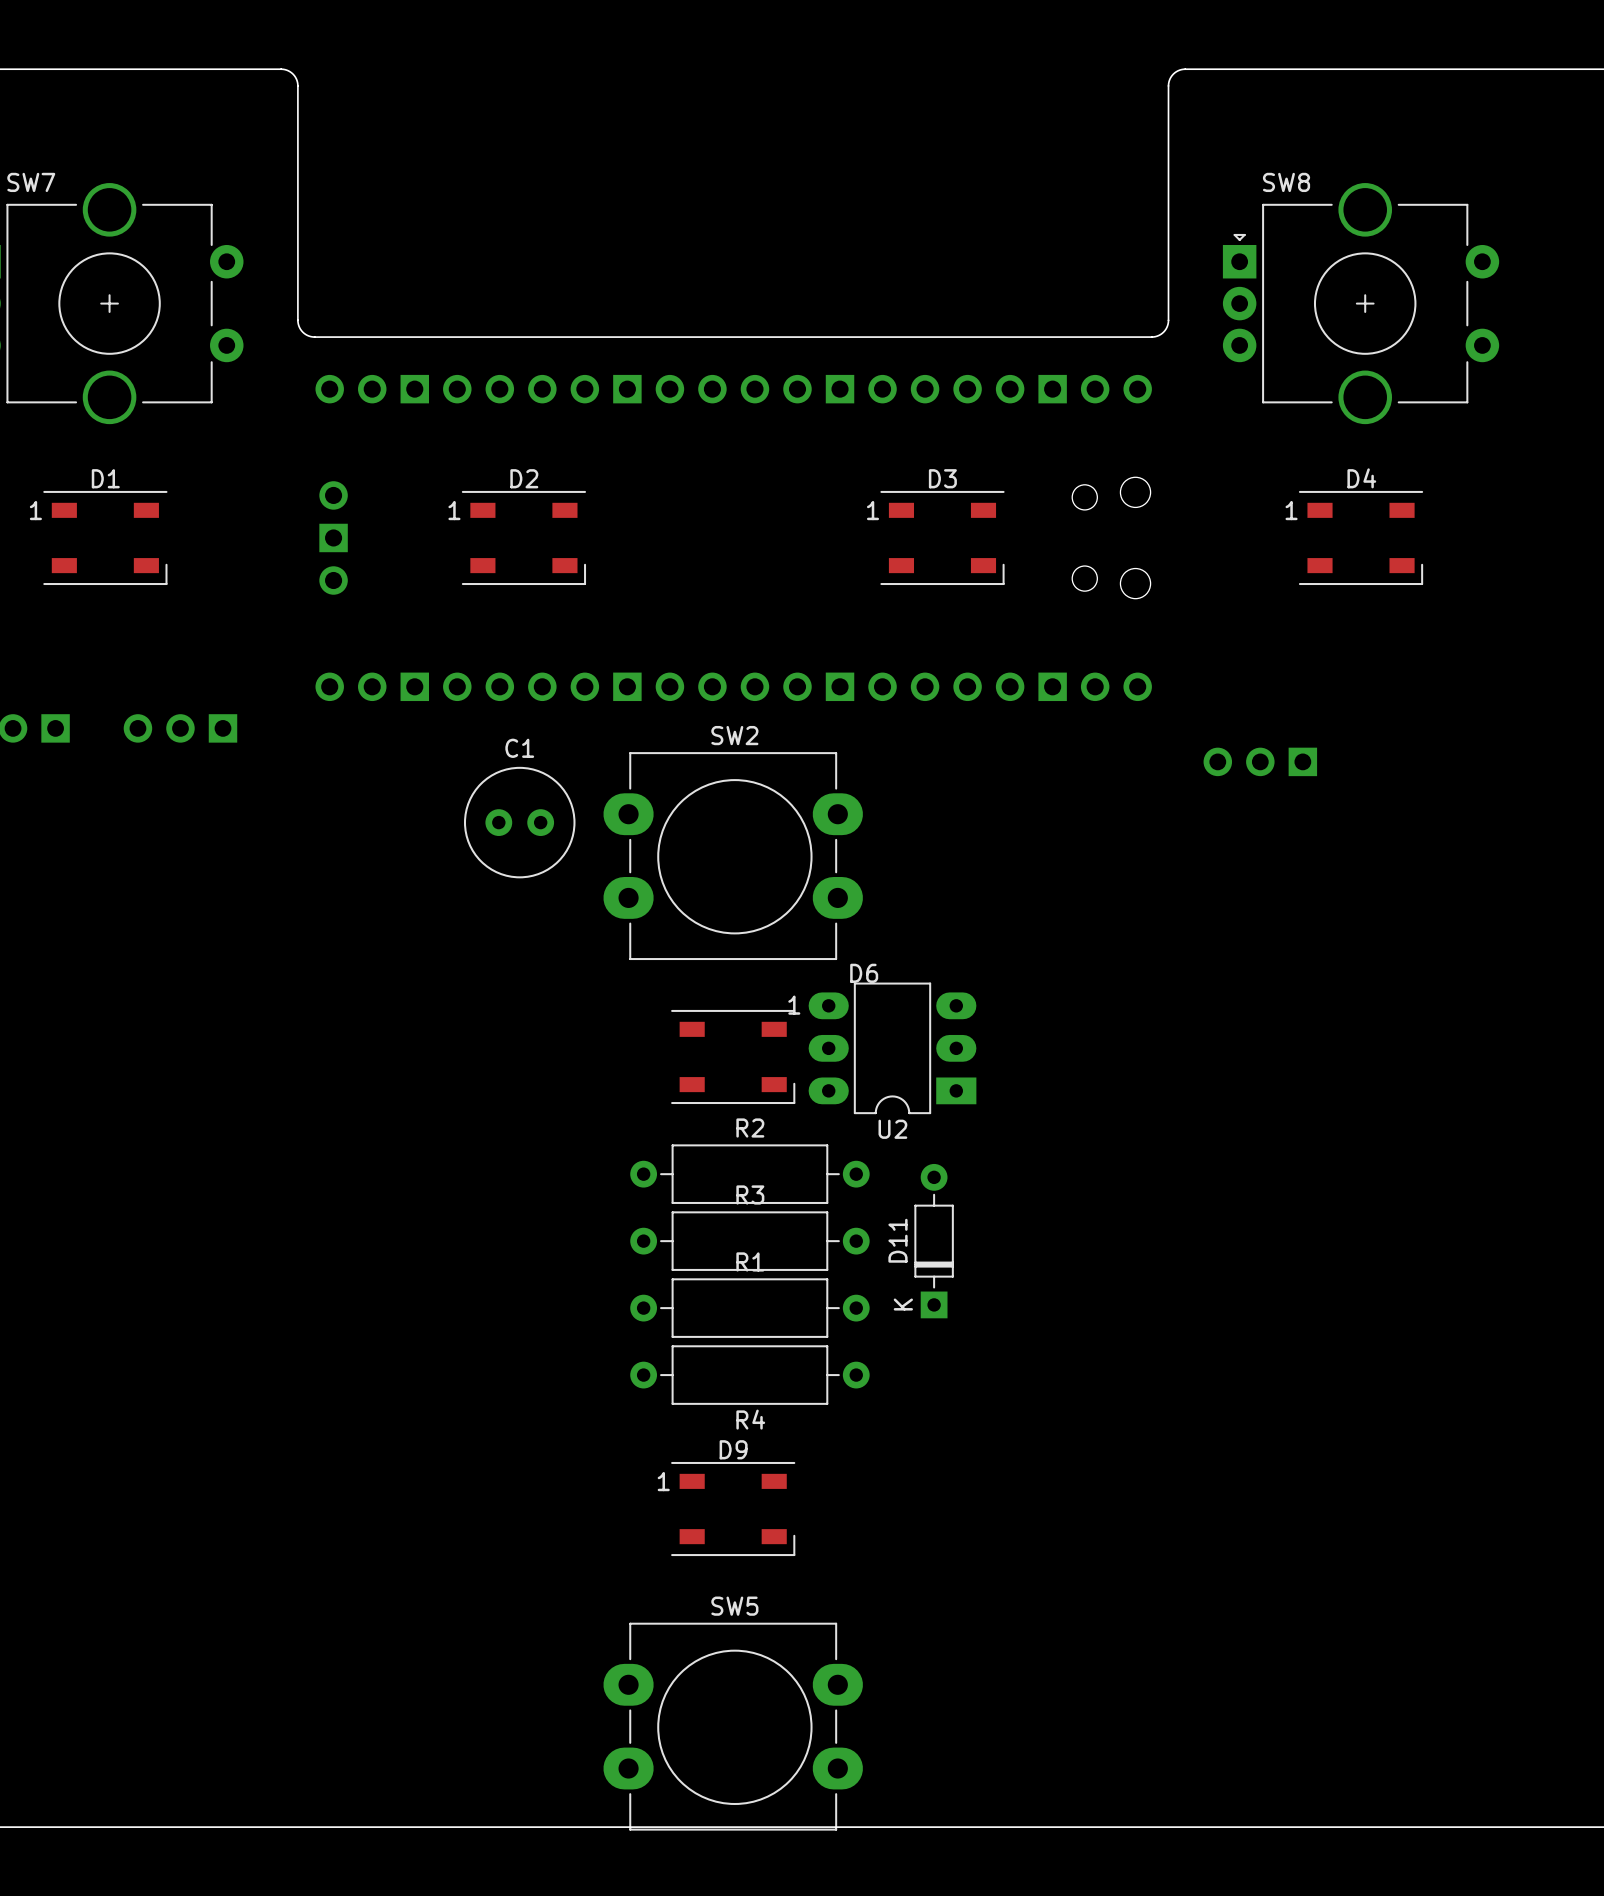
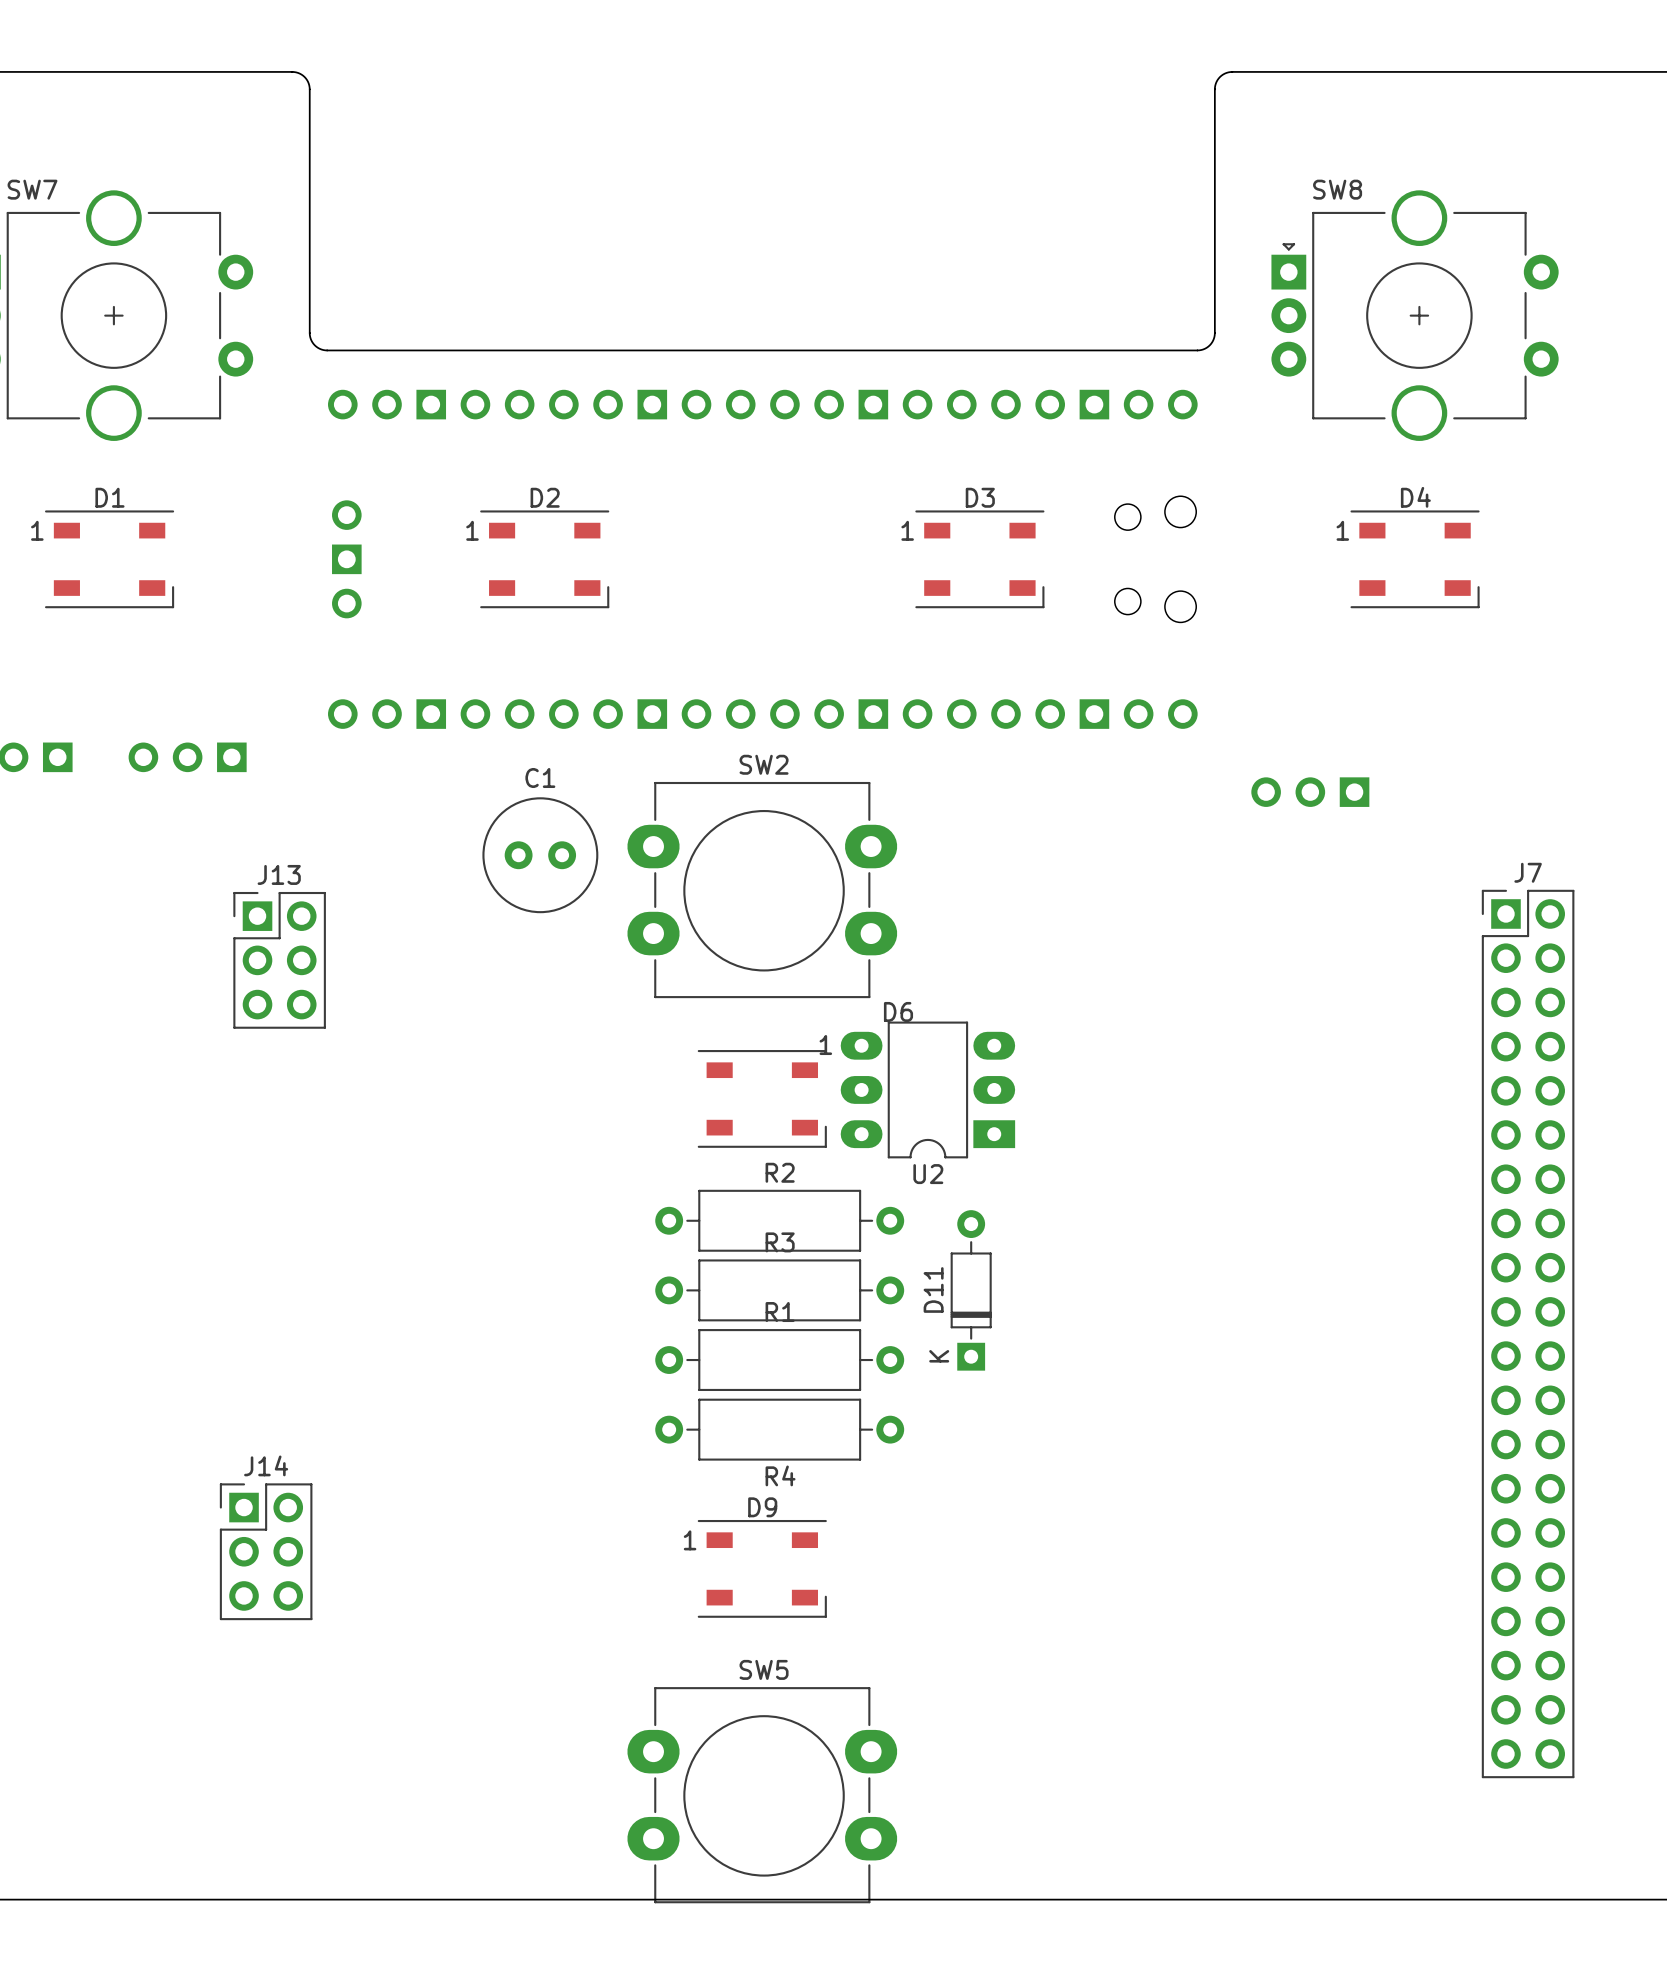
J13: none -> (279, 960)
J7: none -> (1528, 1334)
J14: none -> (266, 1551)

